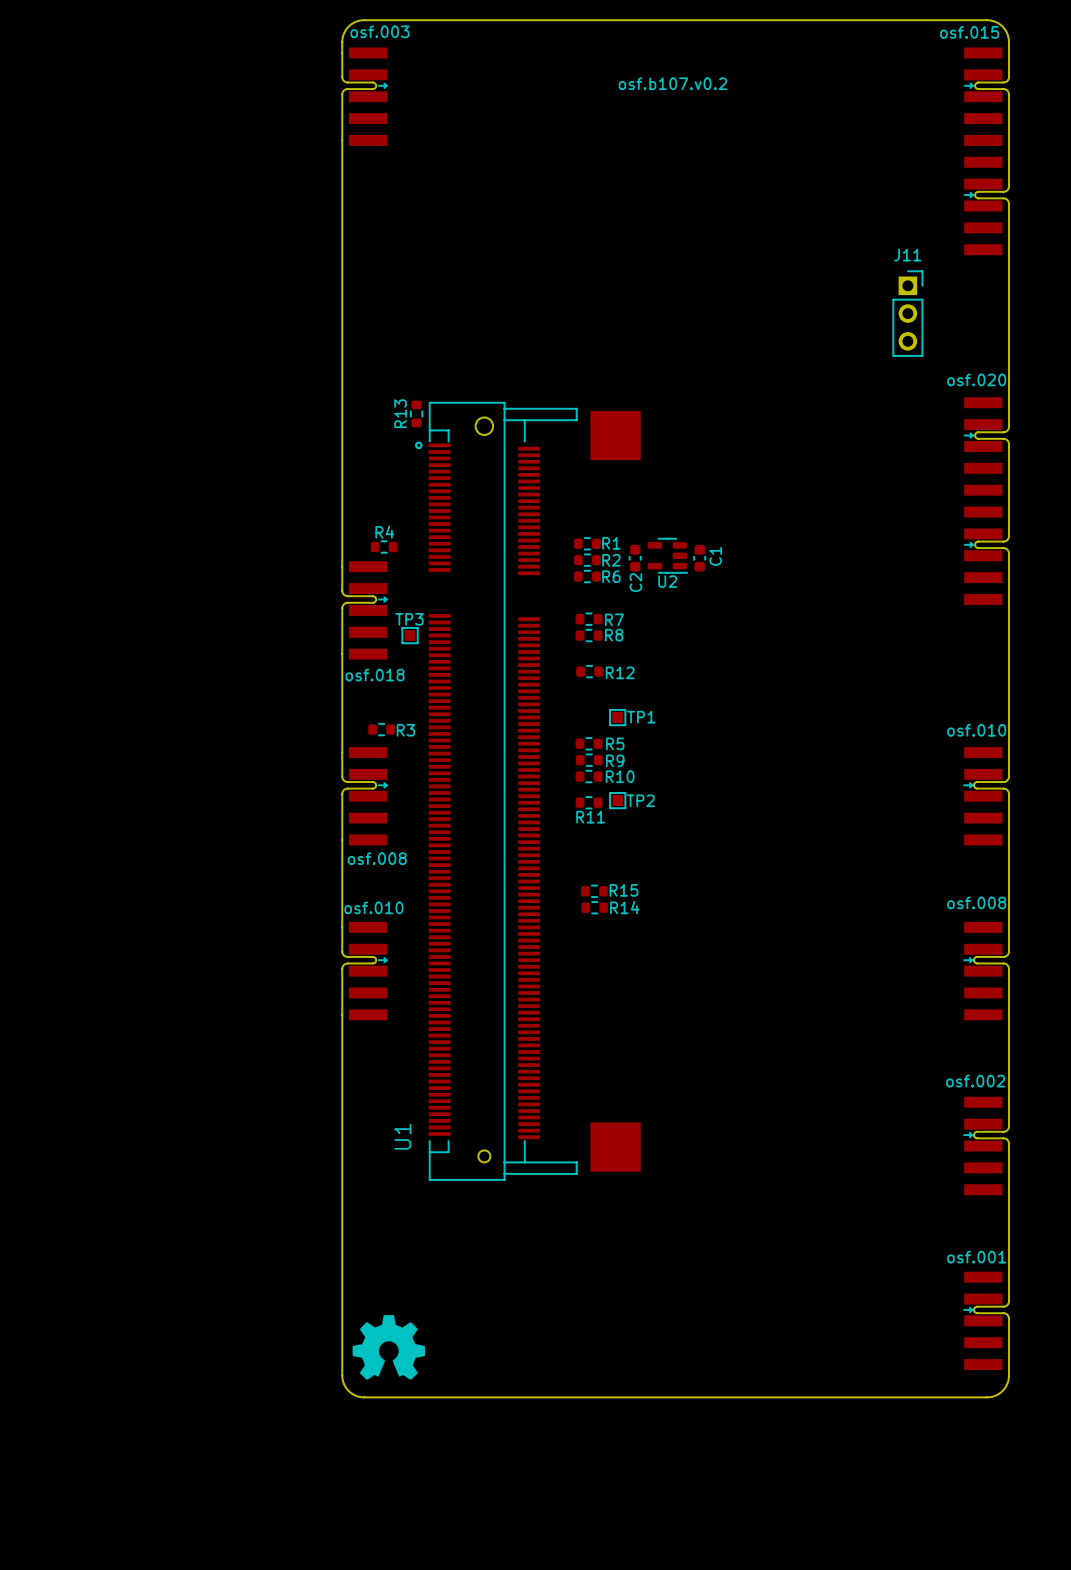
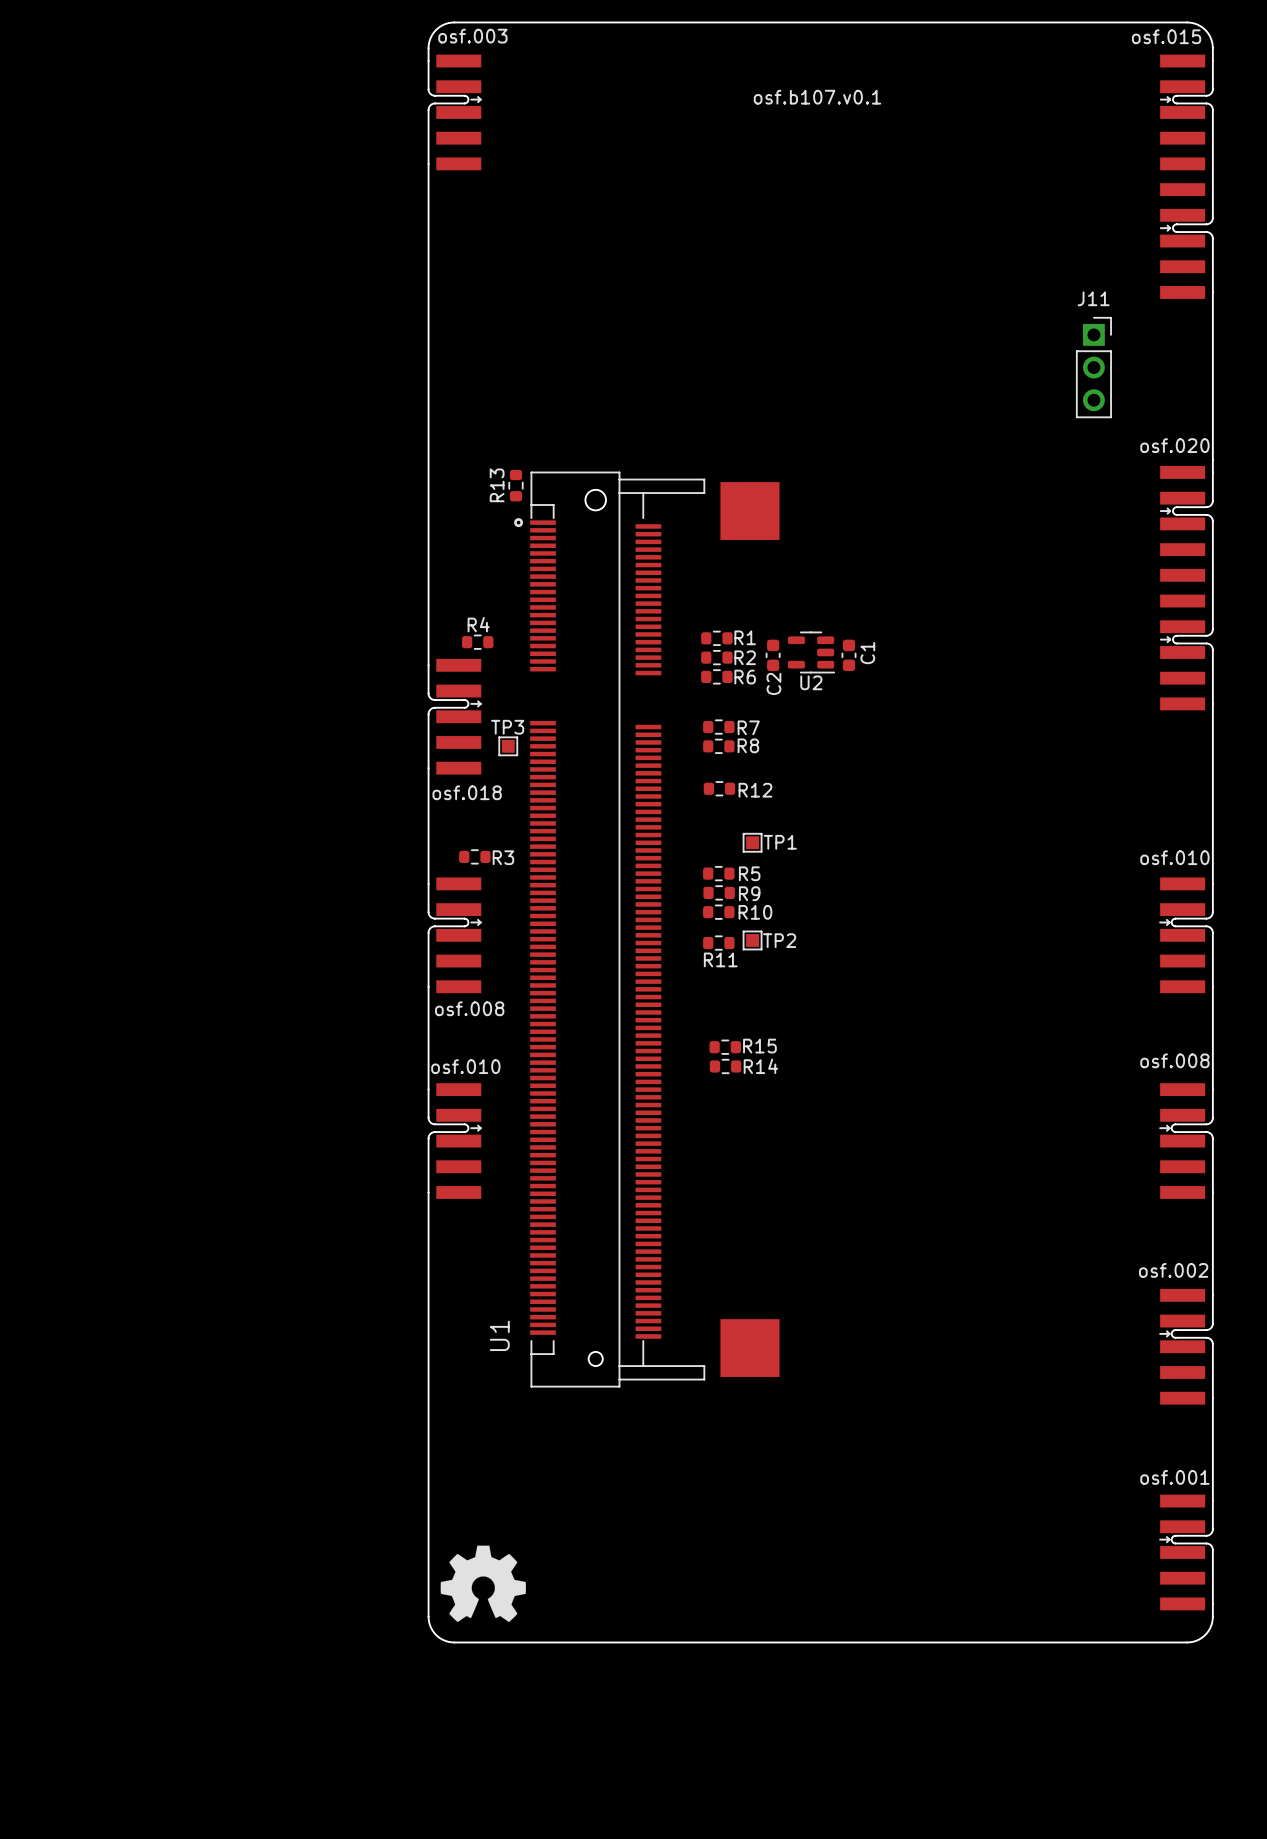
text: osf.b107.v0.2 (672, 83) -> osf.b107.v0.1 (817, 97)

